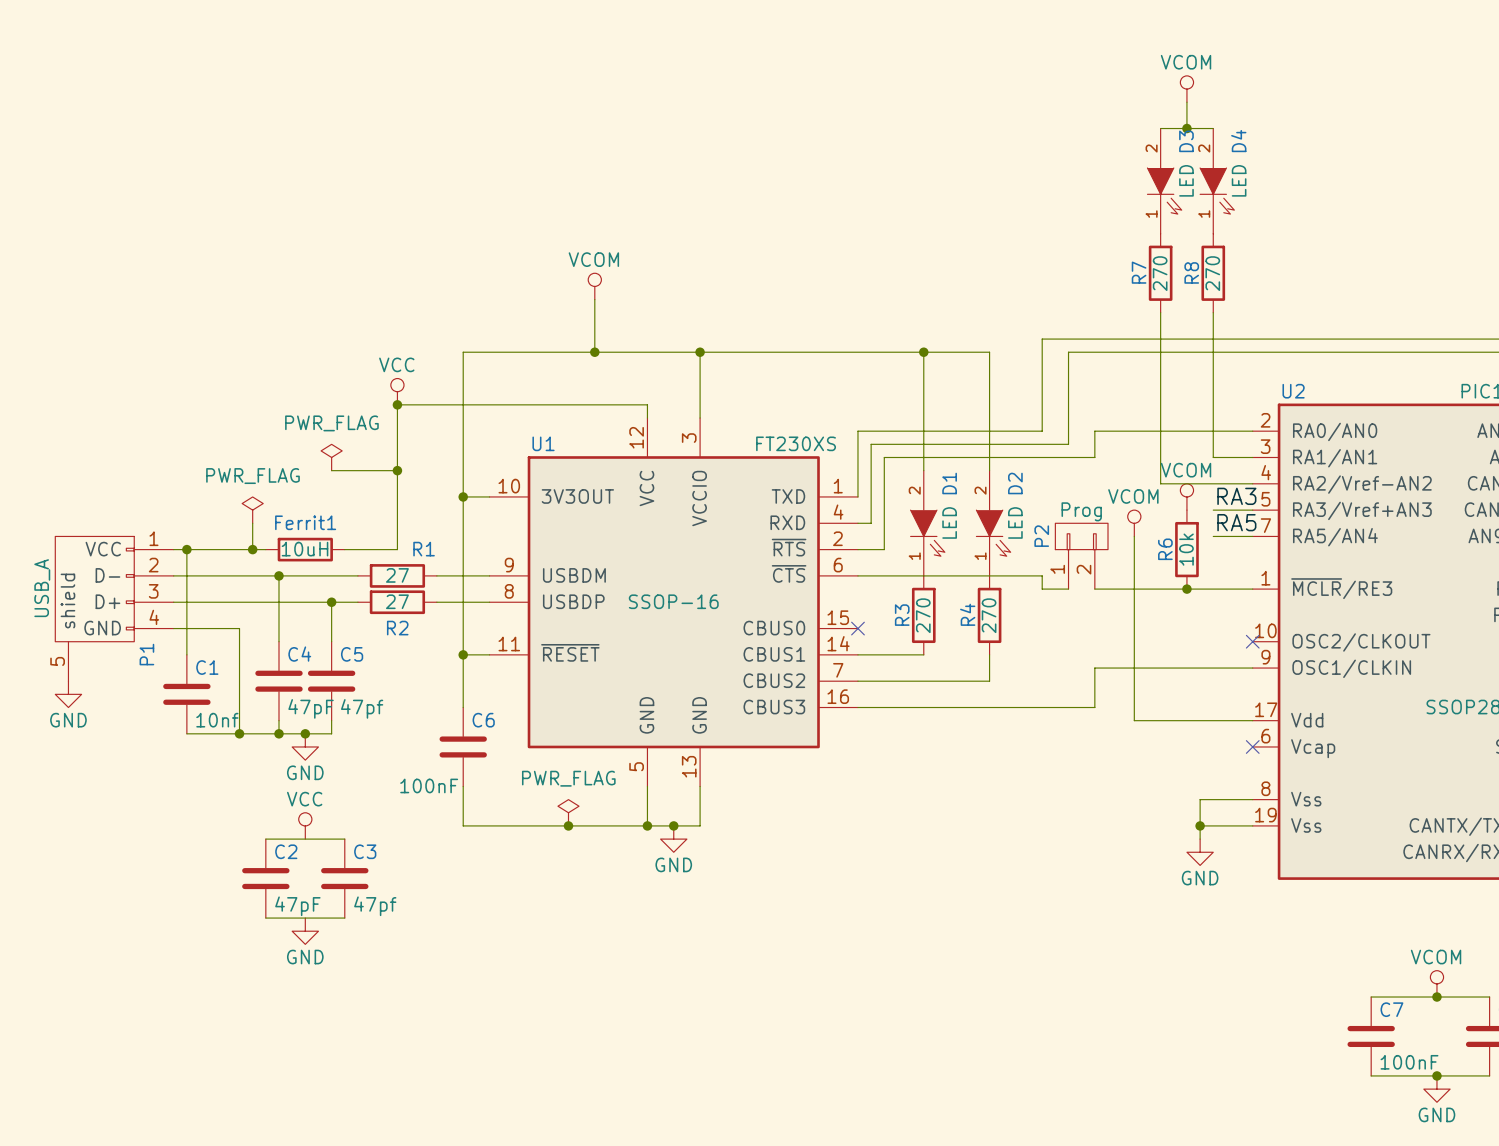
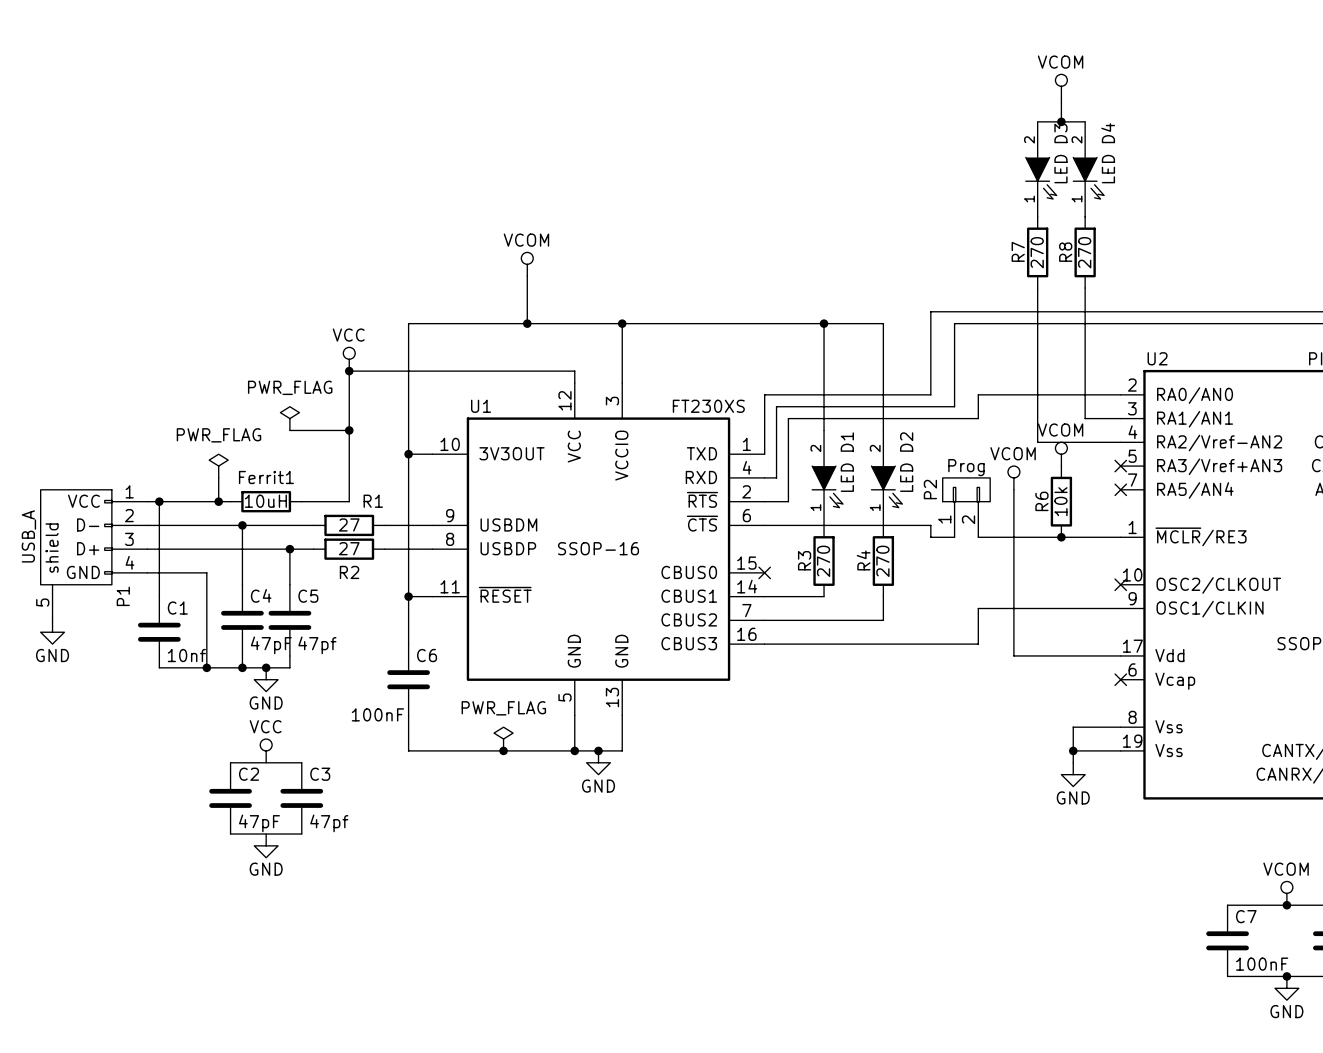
label: RA3 (1236, 496) -> none
wire: (1213, 510) (1252, 510) -> none
no-connect mark: none -> (1120, 466)
label: RA5 (1236, 522) -> none
wire: (1213, 536) (1252, 536) -> none
no-connect mark: none -> (1120, 489)

